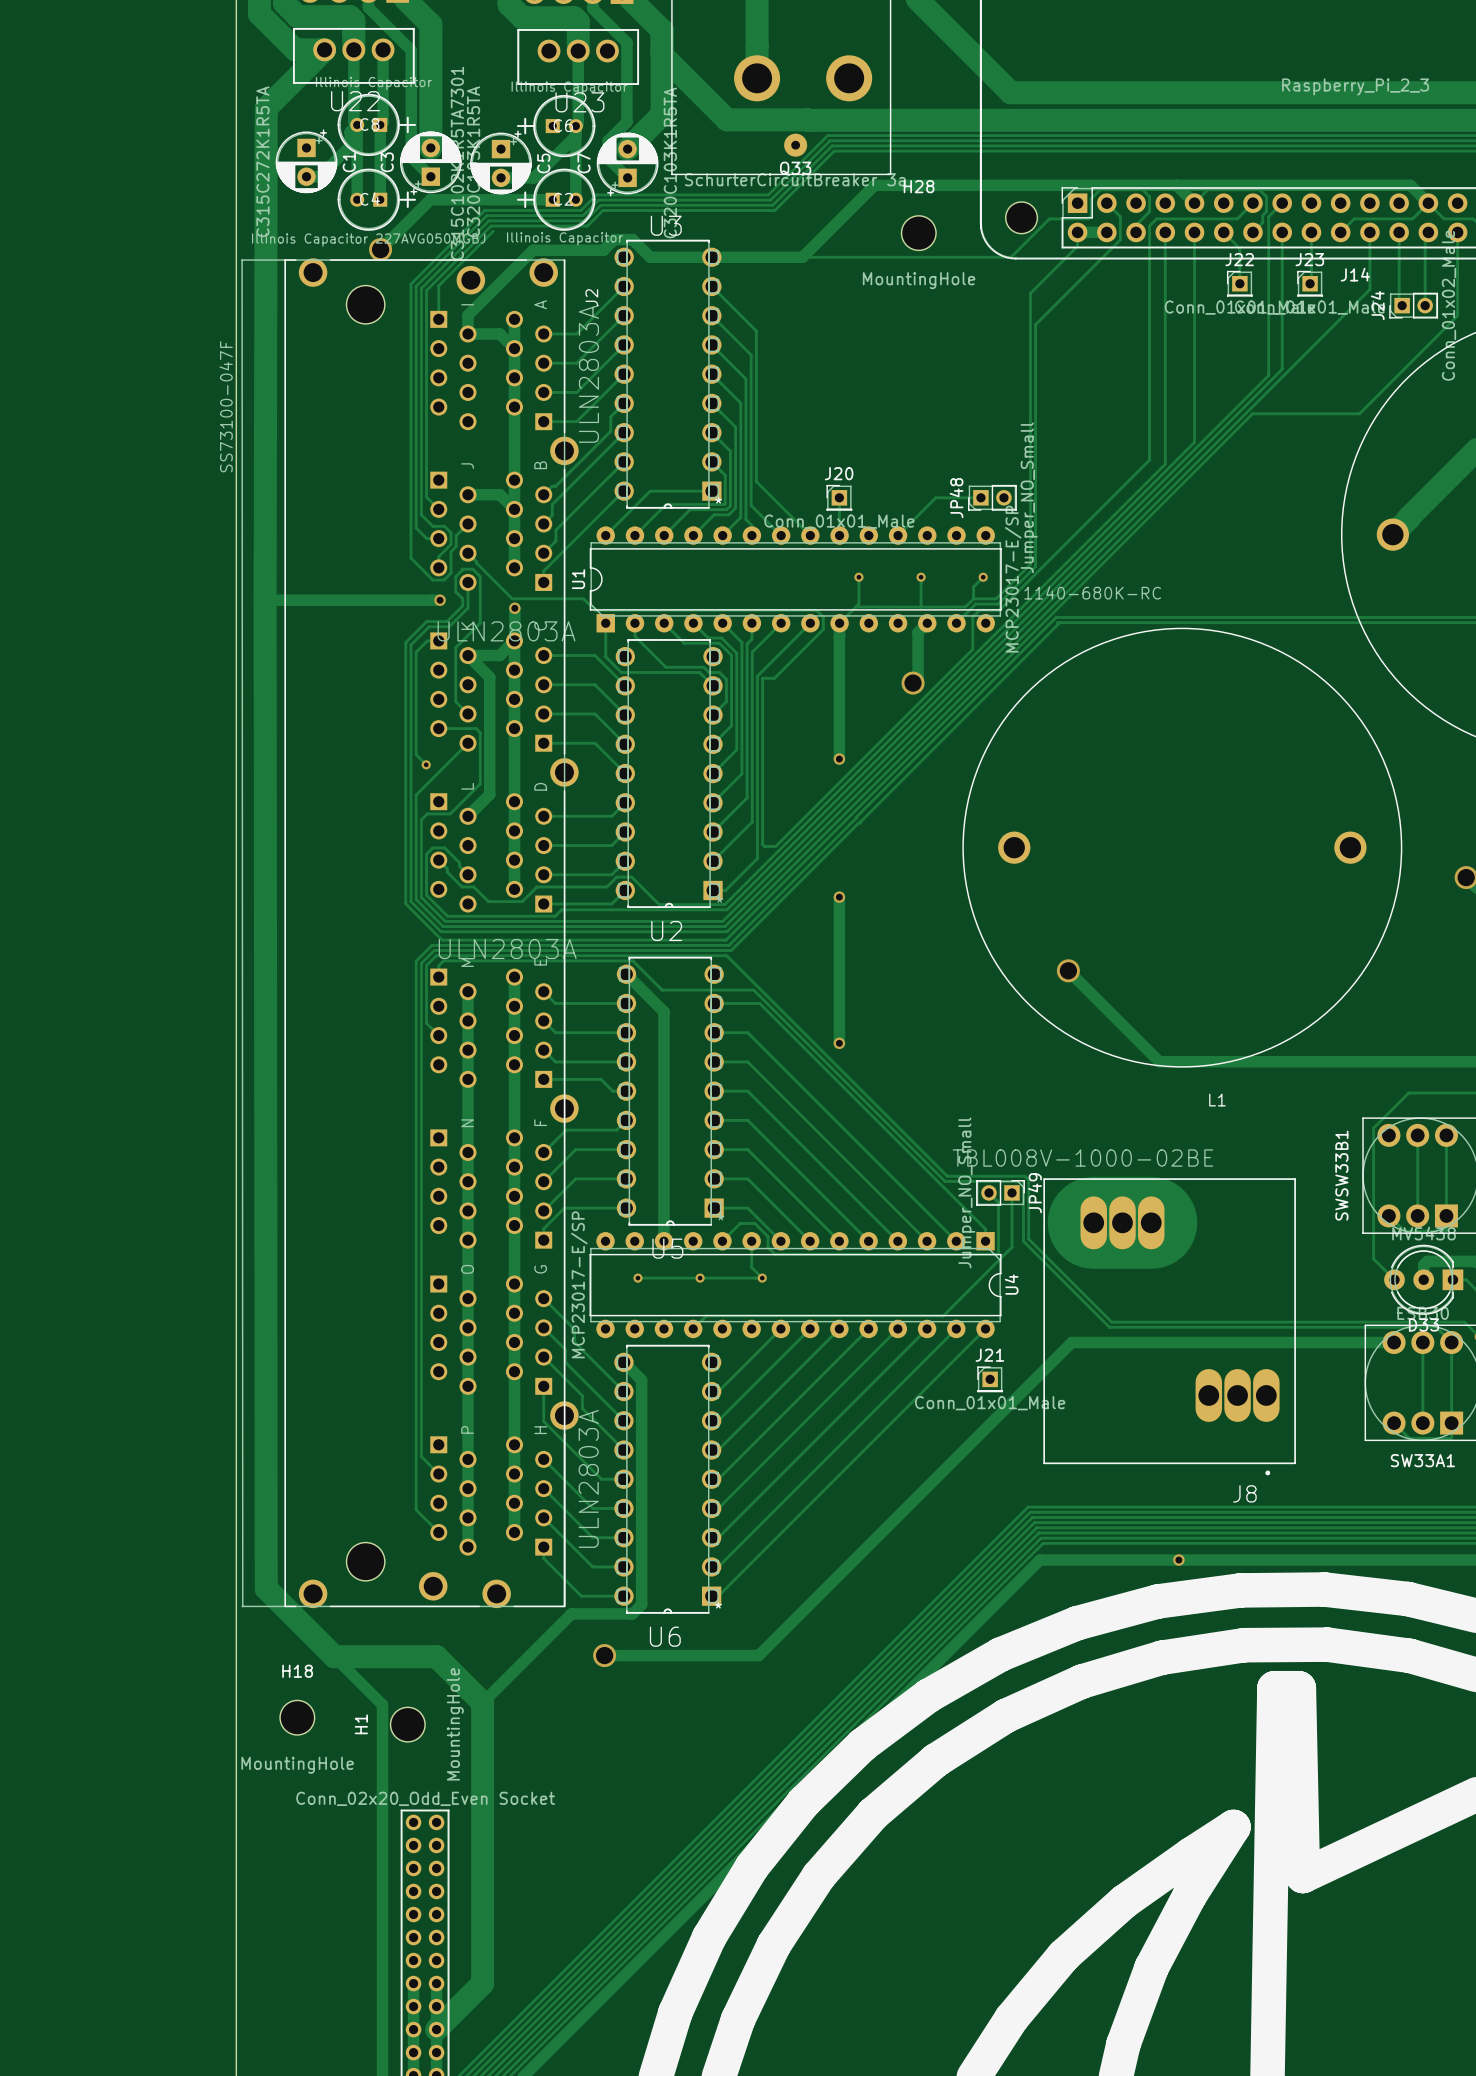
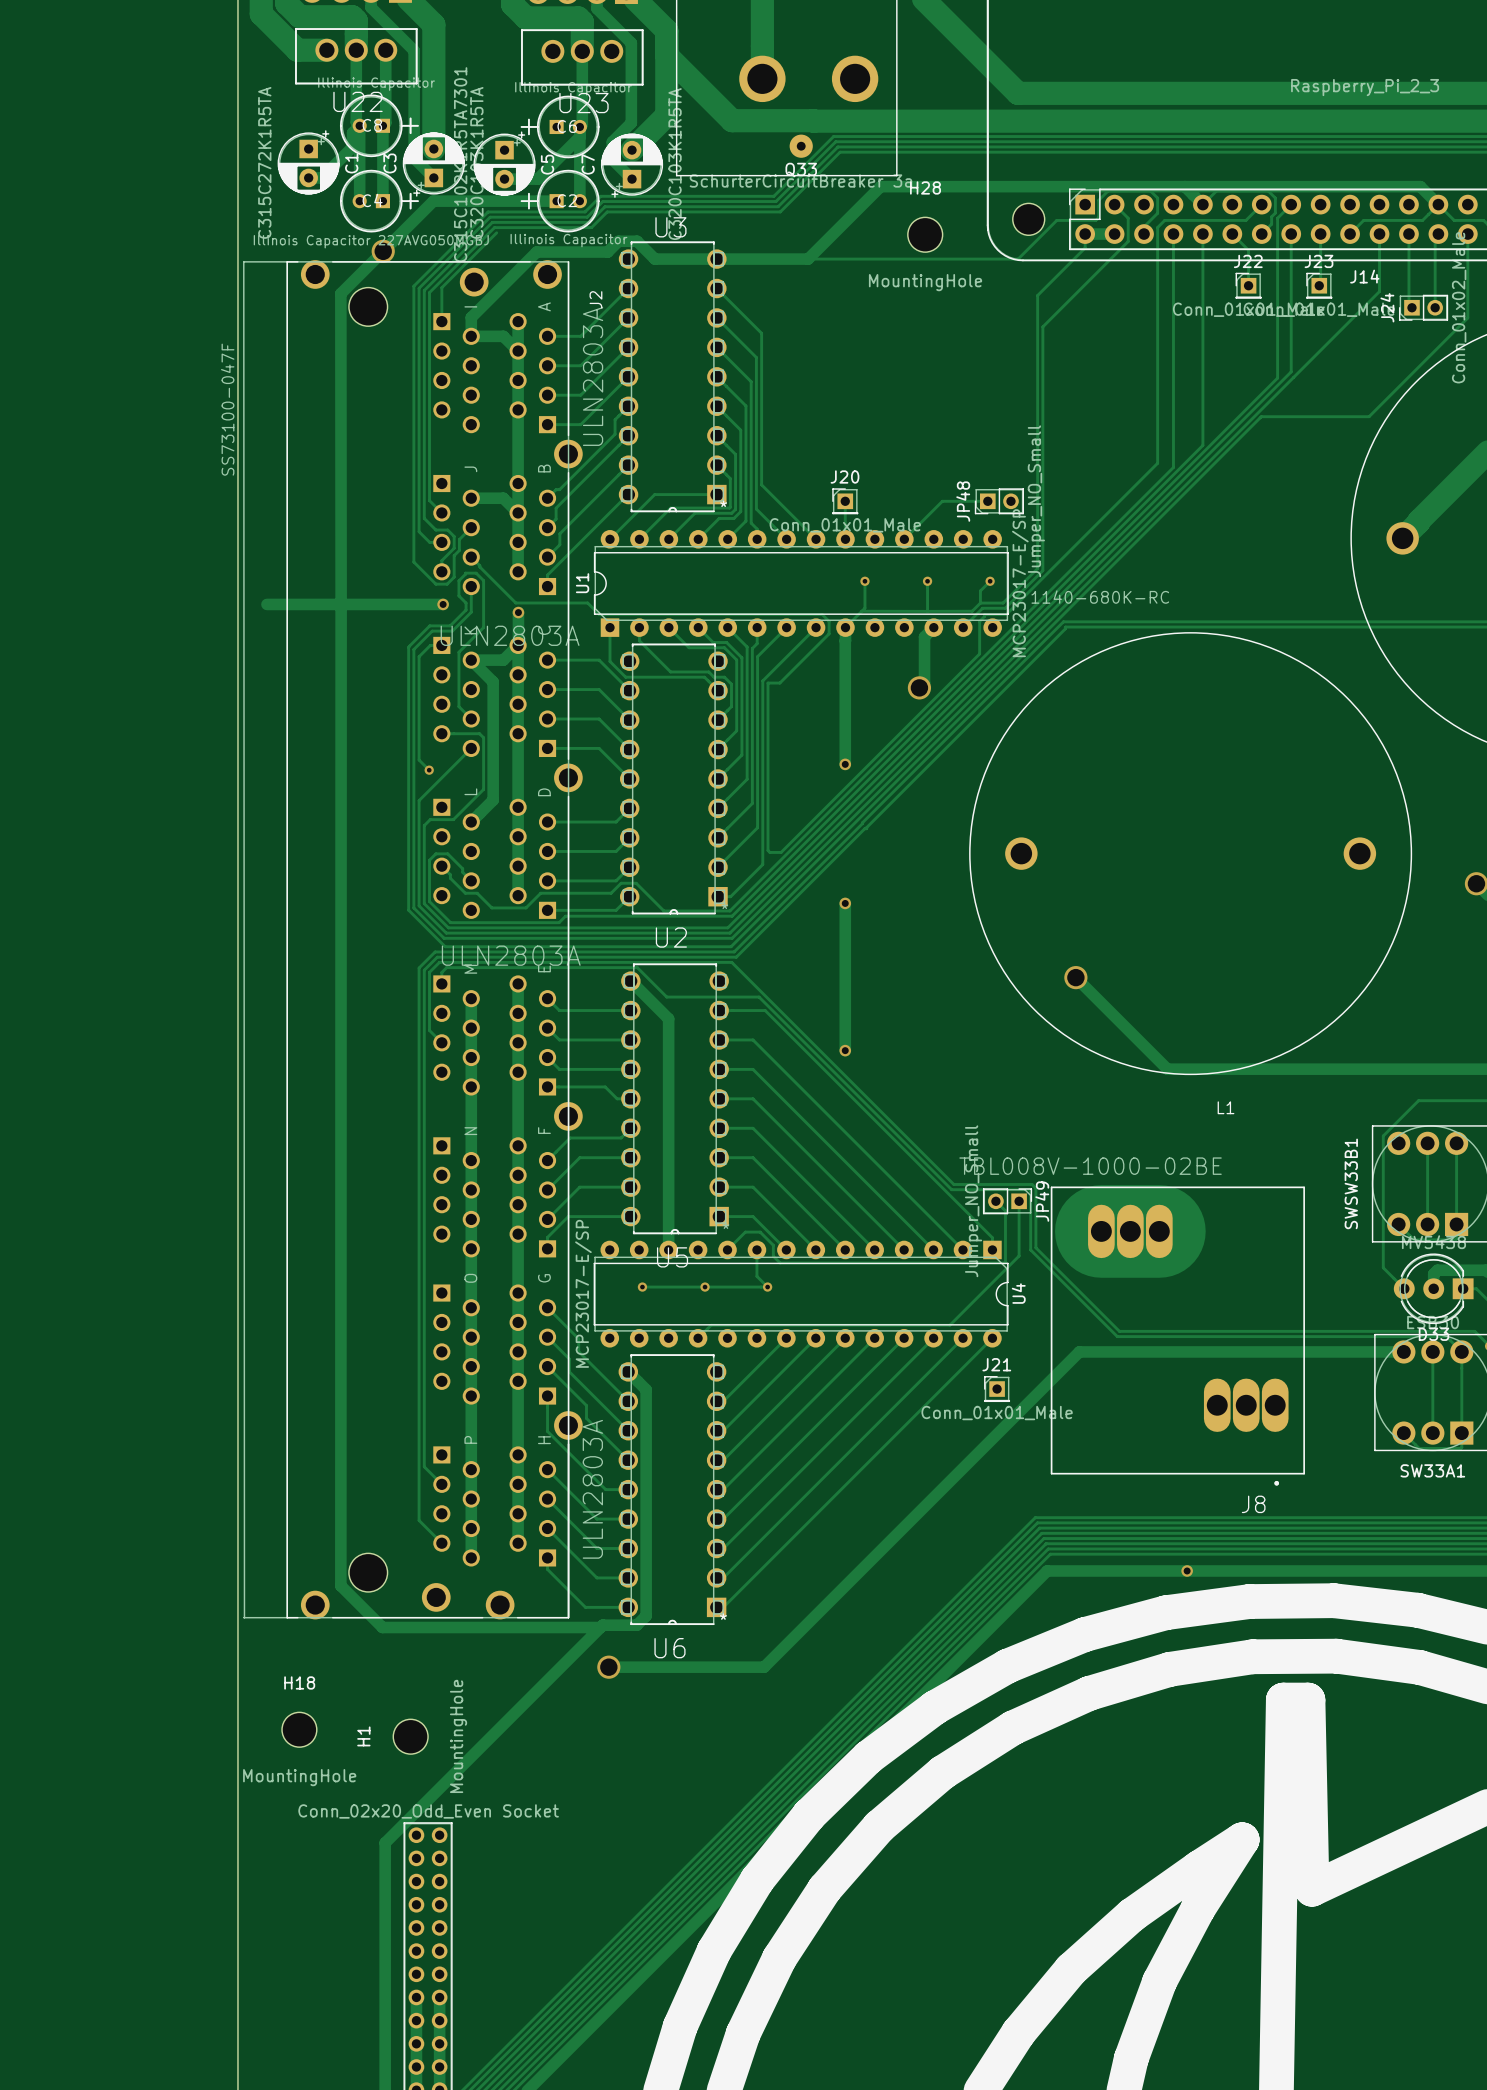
track: (324, 49) (266, 108) (266, 1588) (334, 1656) -> none
track: none -> (383, 251) (340, 293) (340, 1585) (382, 1627) (600, 1627)
track: (598, 1613) (571, 1613) (482, 1702) -> (602, 1625) (385, 1842)
track: (334, 1656) (436, 1656) (482, 1702) -> none
track: (334, 1656) (382, 1704) (382, 1830) -> none
track: (482, 1702) (482, 1983) (436, 2029) -> none

